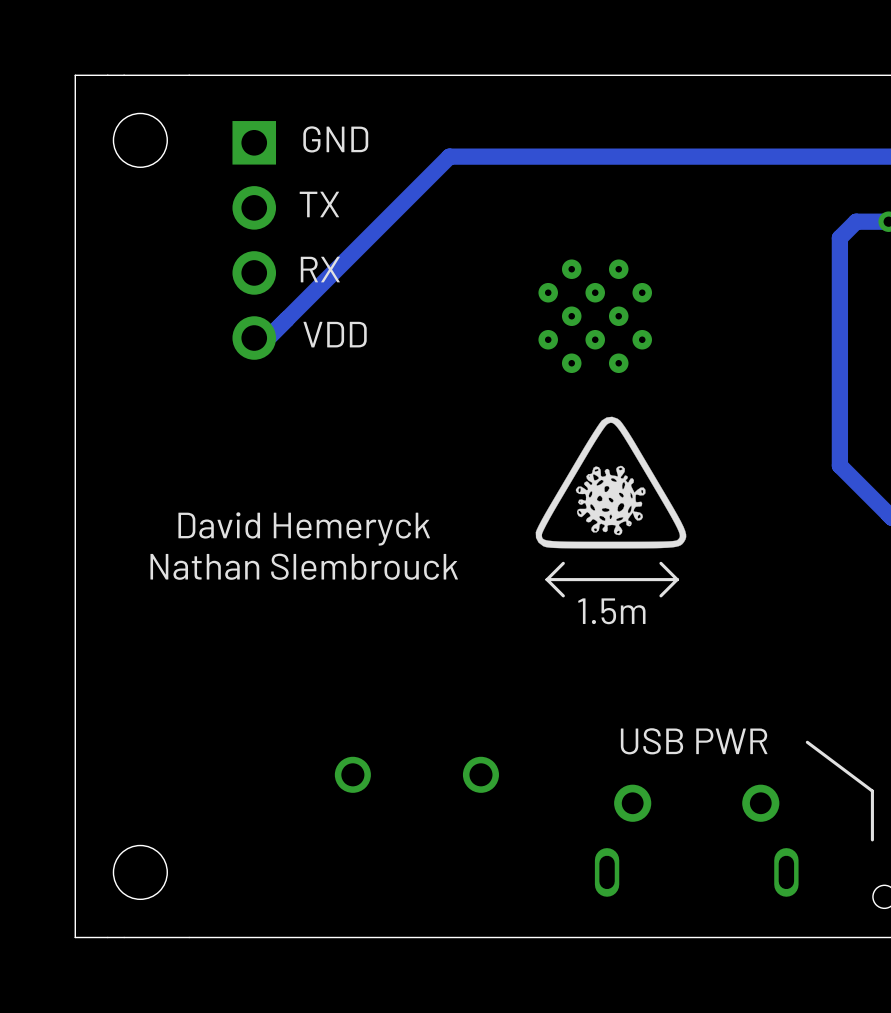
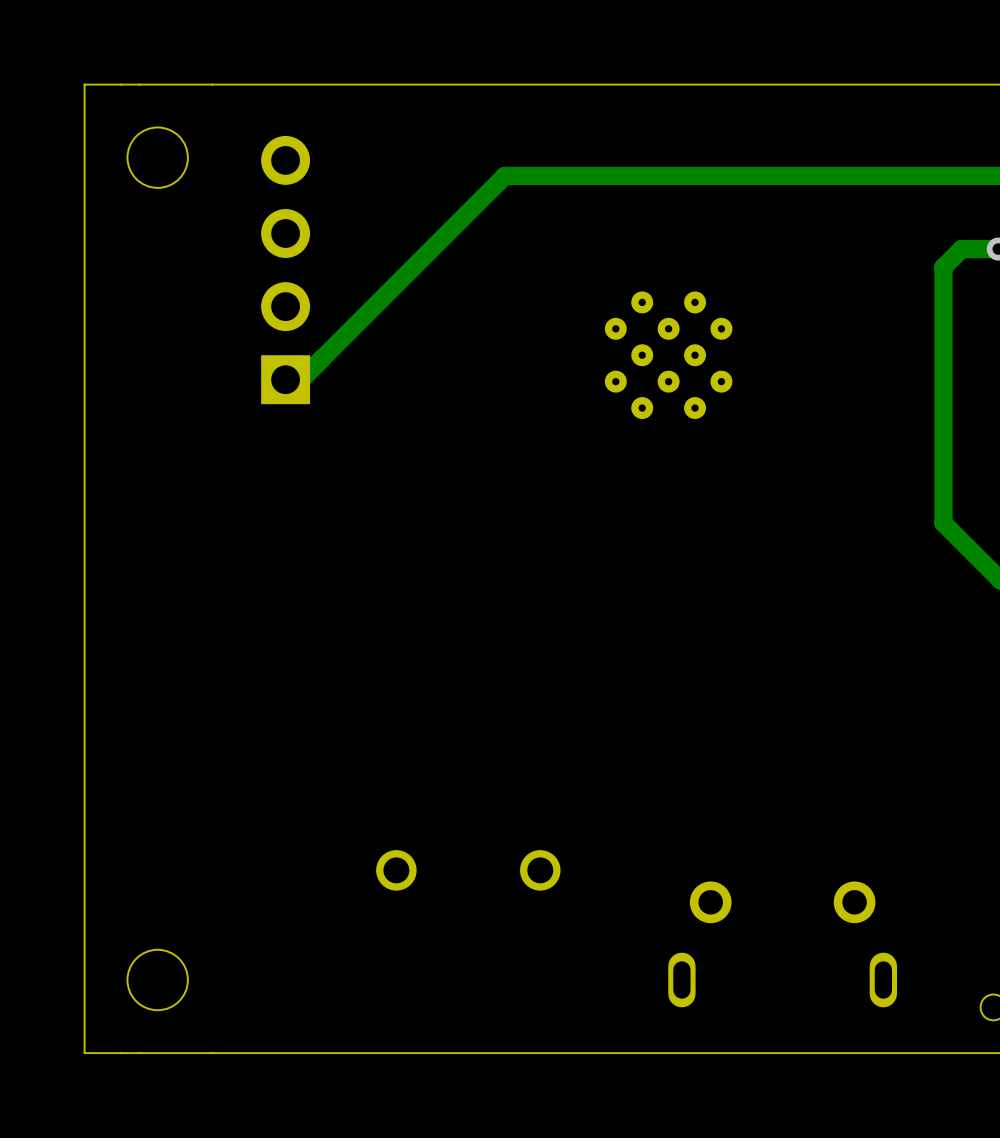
text: GND (335, 139) -> none
text: TX (319, 204) -> none
part rotation: 0° (254, 240) -> 180° (285, 270)
text: RX (320, 269) -> none
text: VDD (335, 334) -> none
drawing: [535, 416, 687, 549] -> none
text: David Hemeryck (304, 528) -> none
line: (563, 563) (547, 579) -> none
line: (660, 563) (677, 579) -> none
text: Nathan Slembrouck (304, 566) -> none
line: (547, 579) (563, 595) -> none
line: (677, 579) (660, 595) -> none
line: (677, 579) (547, 579) -> none
text: 1.5m (611, 611) -> none
text: USB PWR (694, 741) -> none
line: (807, 742) (872, 791) (872, 839) -> none

